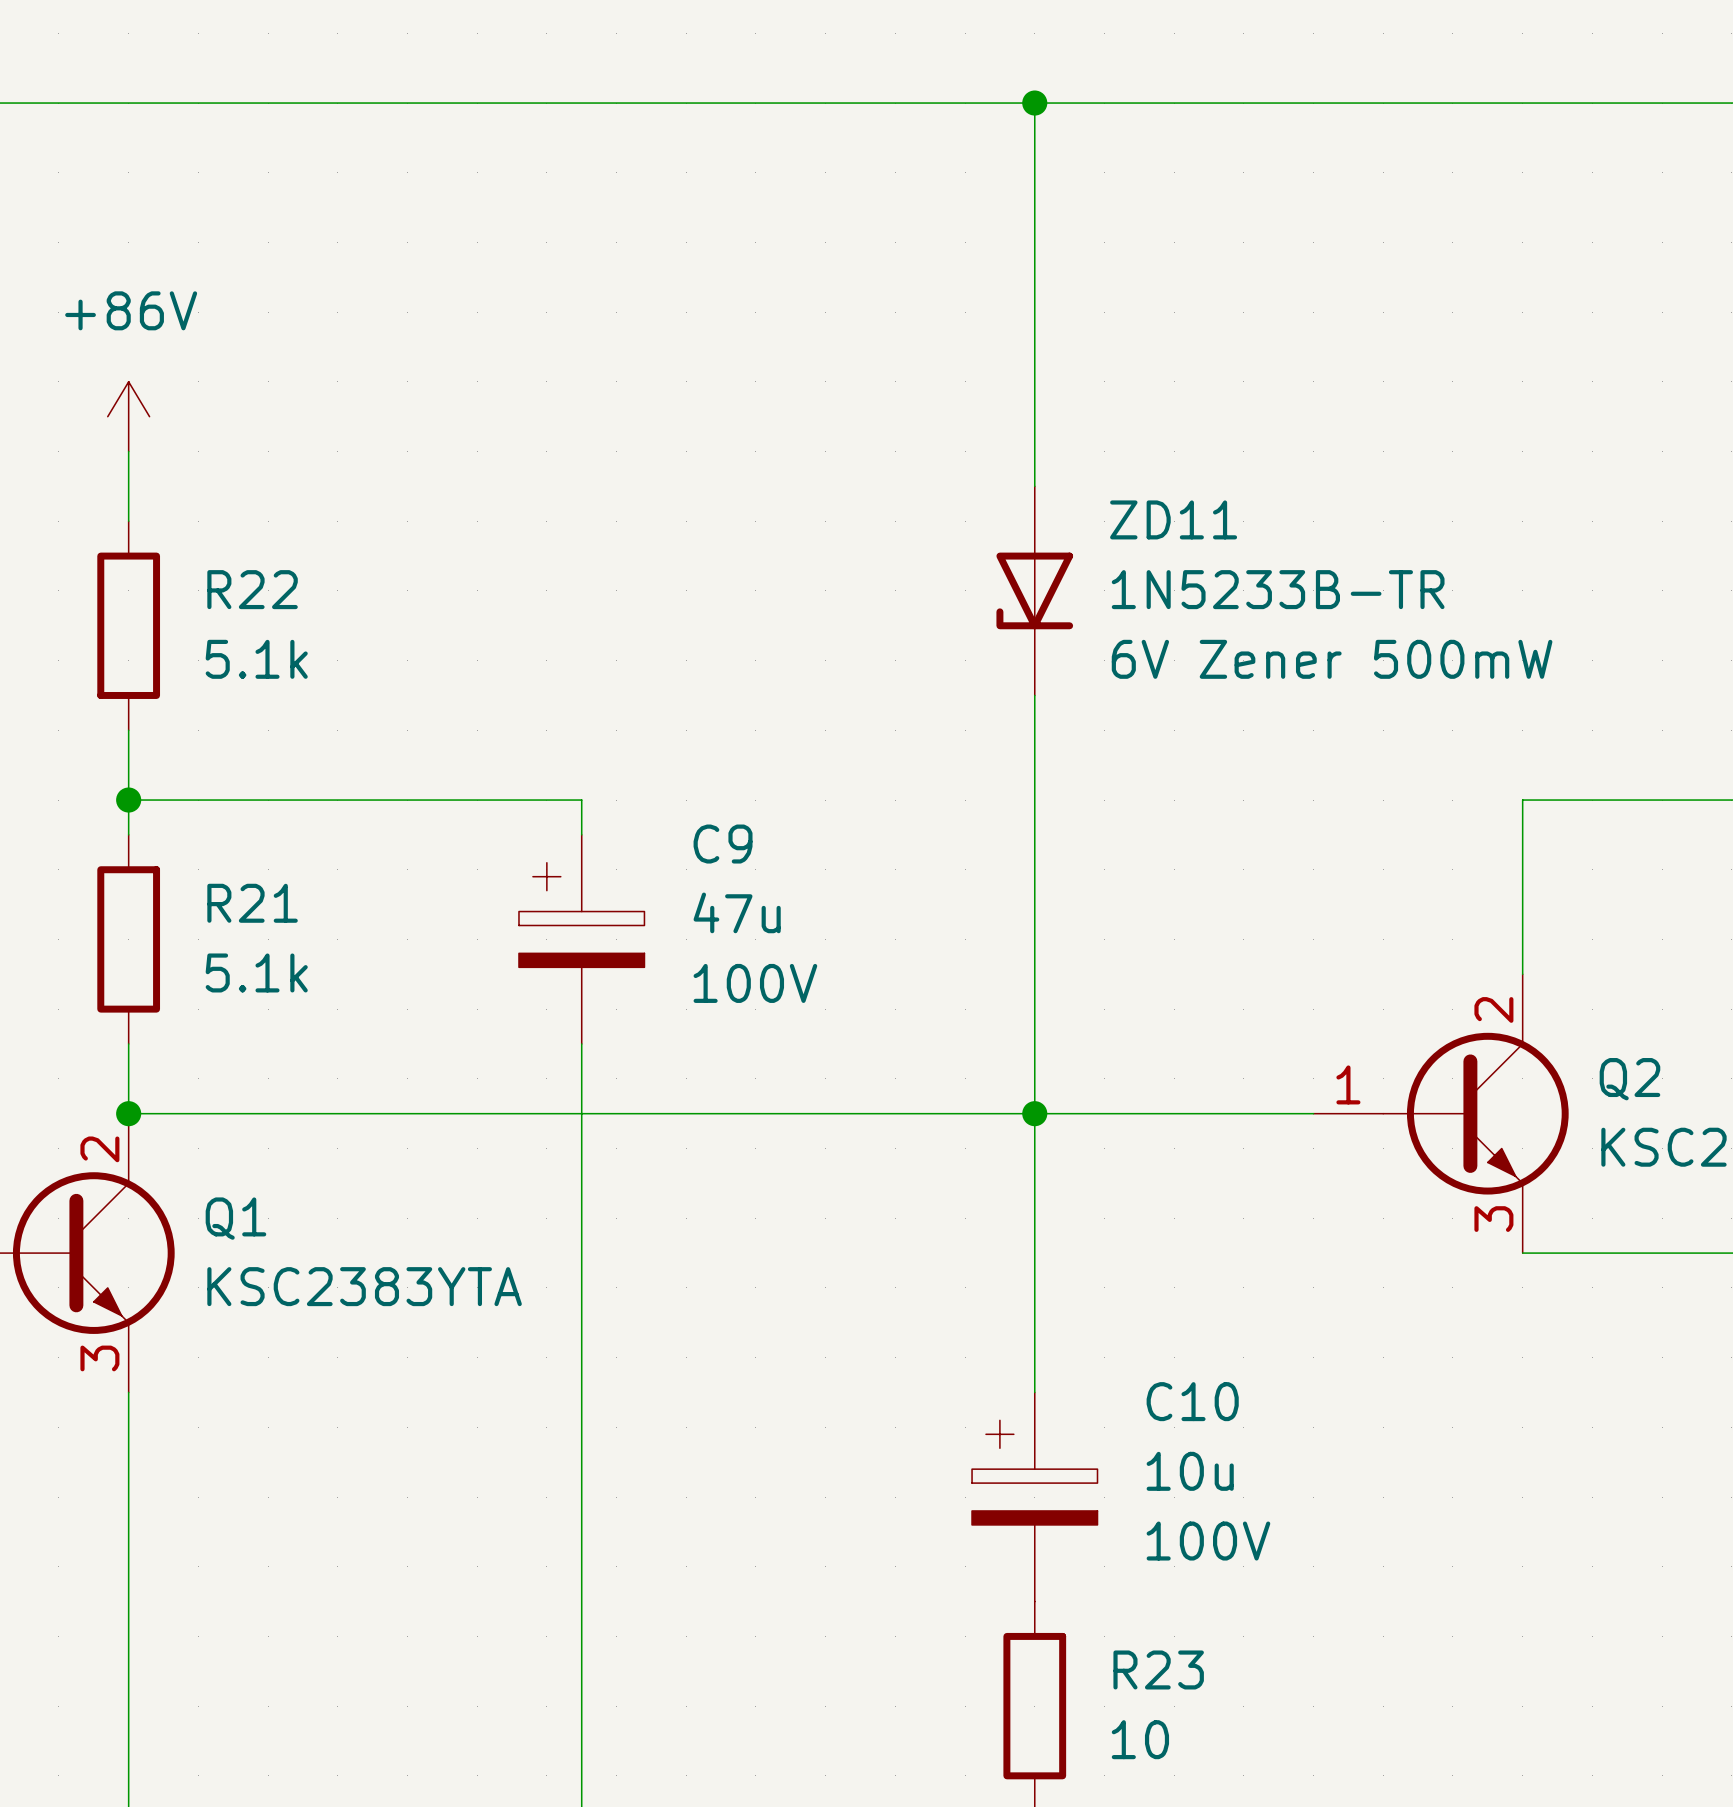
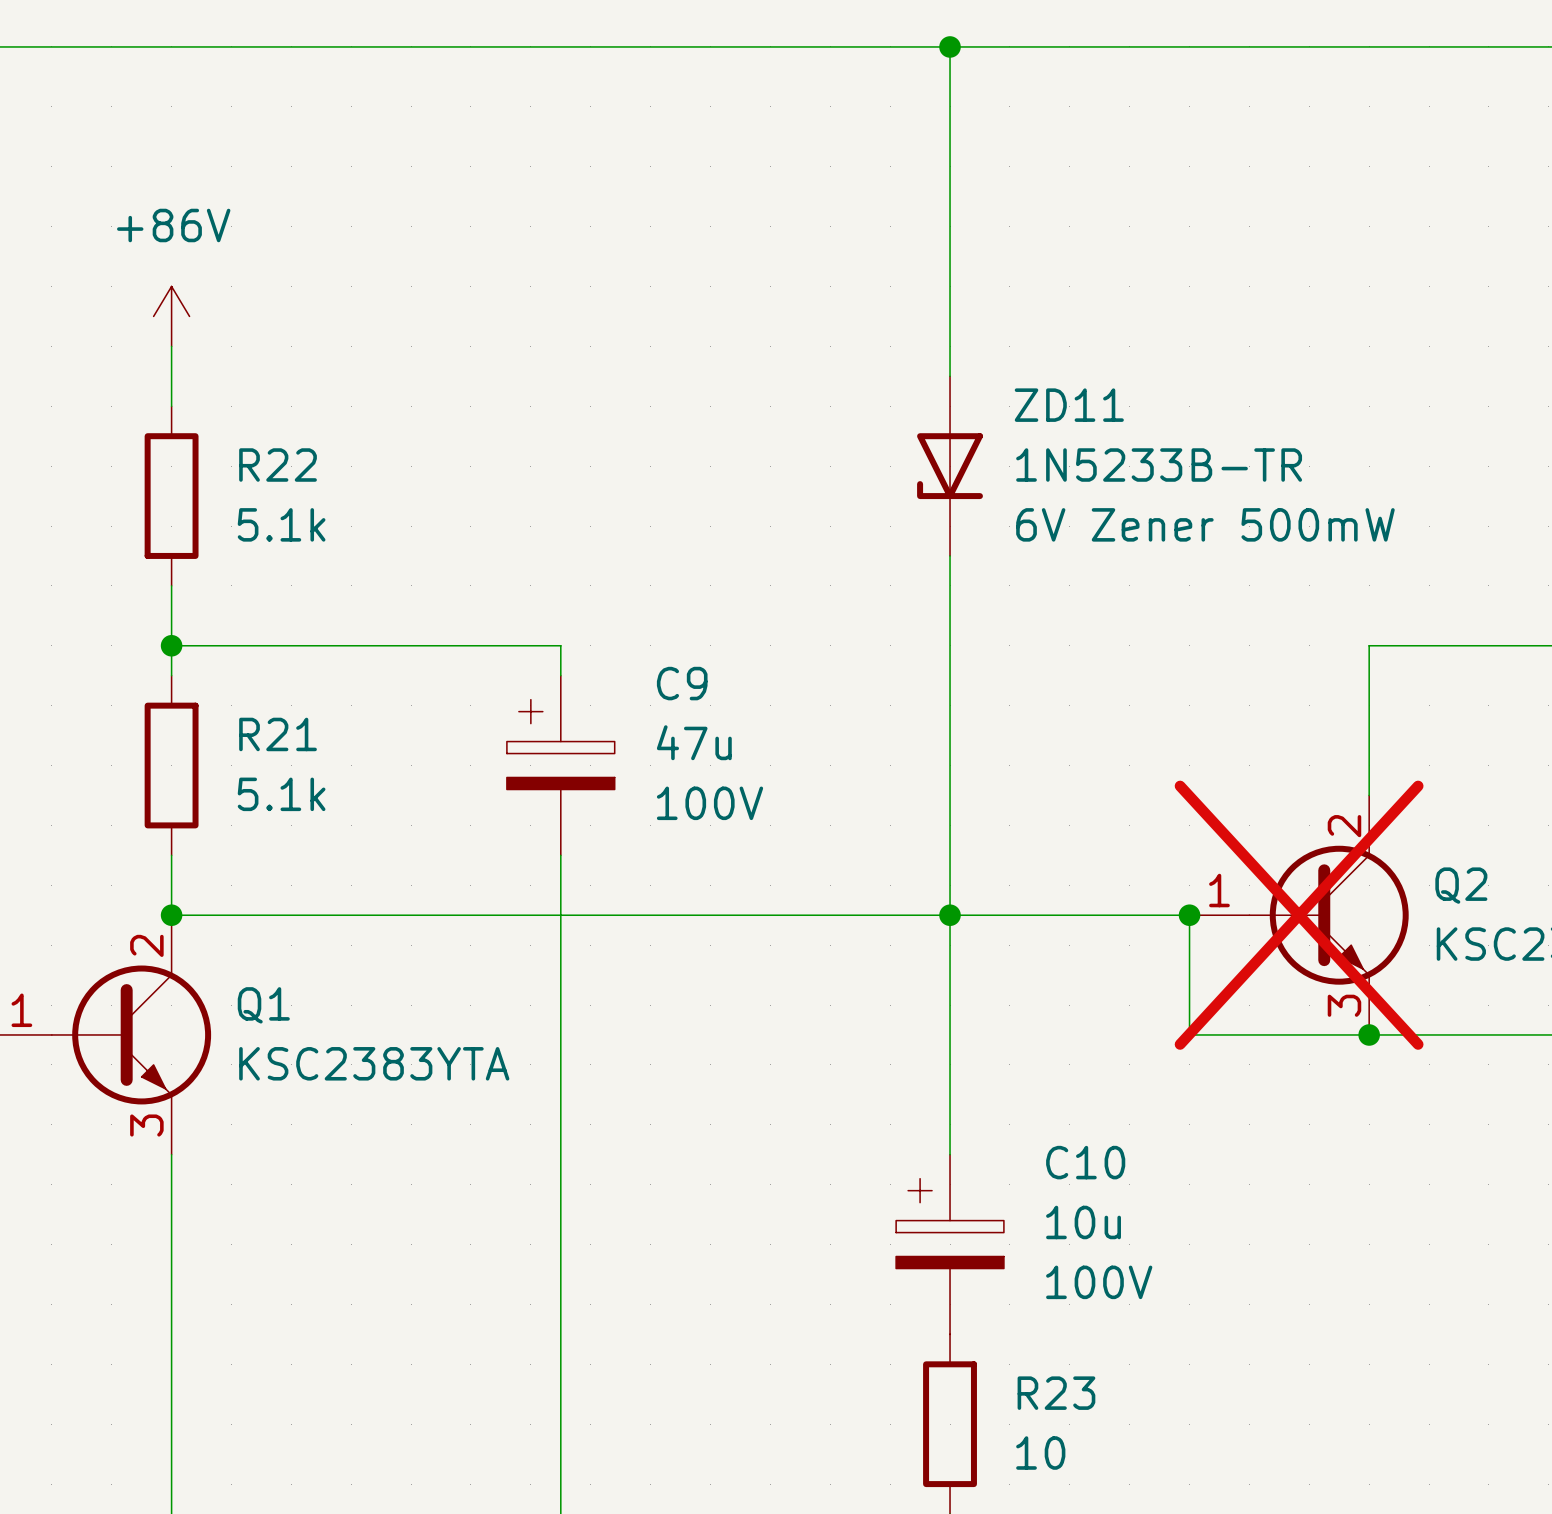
wire: none -> (1189, 915) (1189, 1034) (1369, 1034)
junction: none -> (1189, 915)
Q2 do-not-place cross: none -> (1299, 915)
junction: none -> (1369, 1034)

